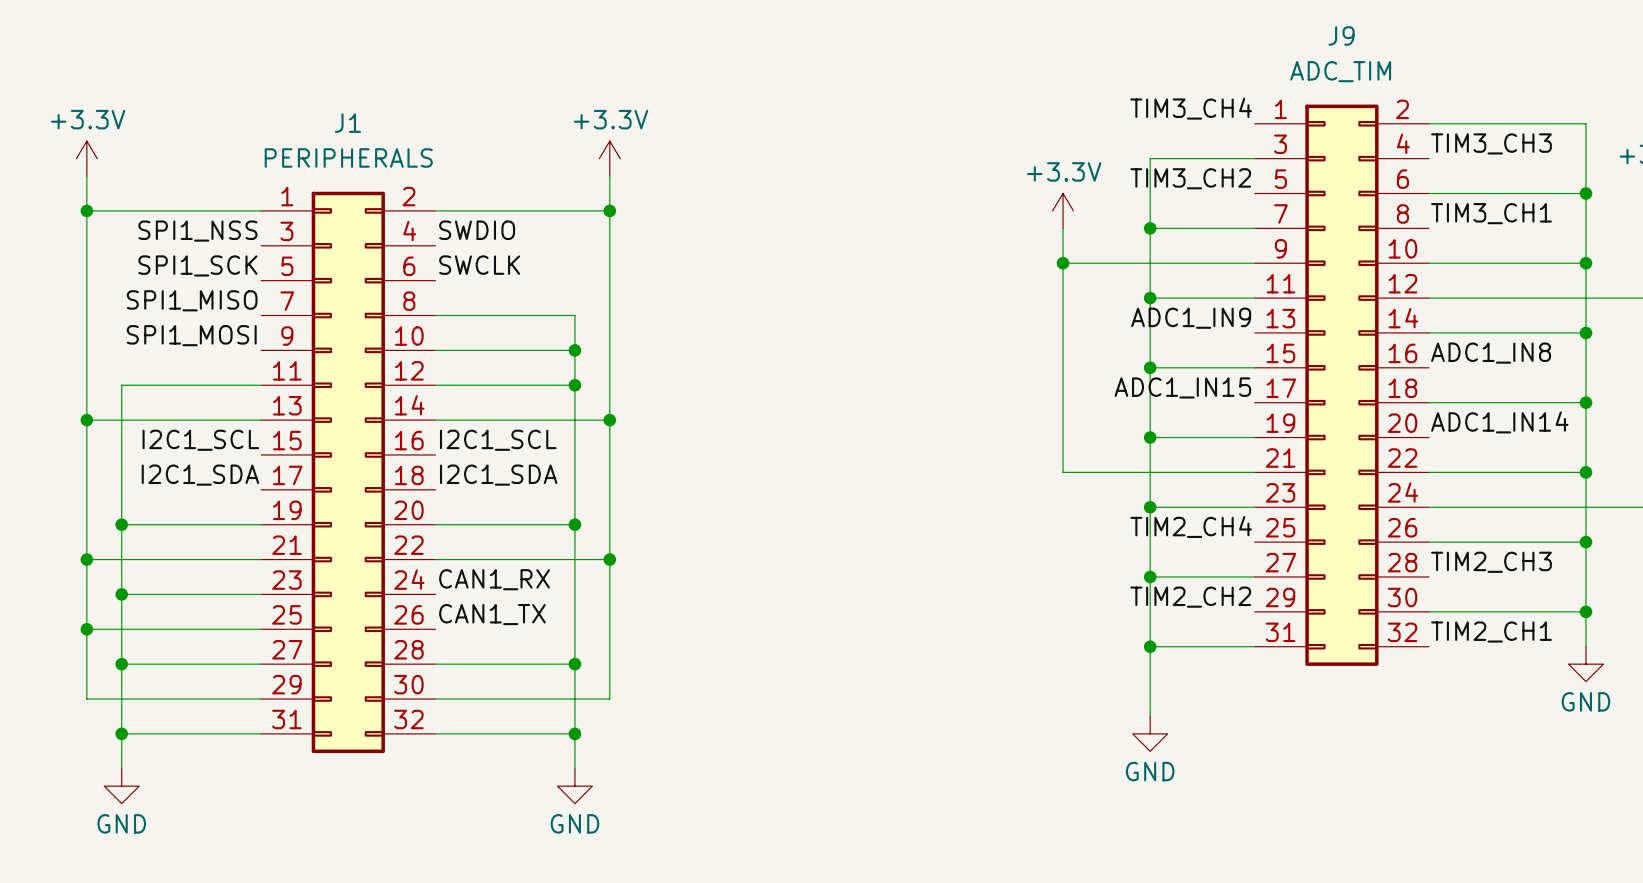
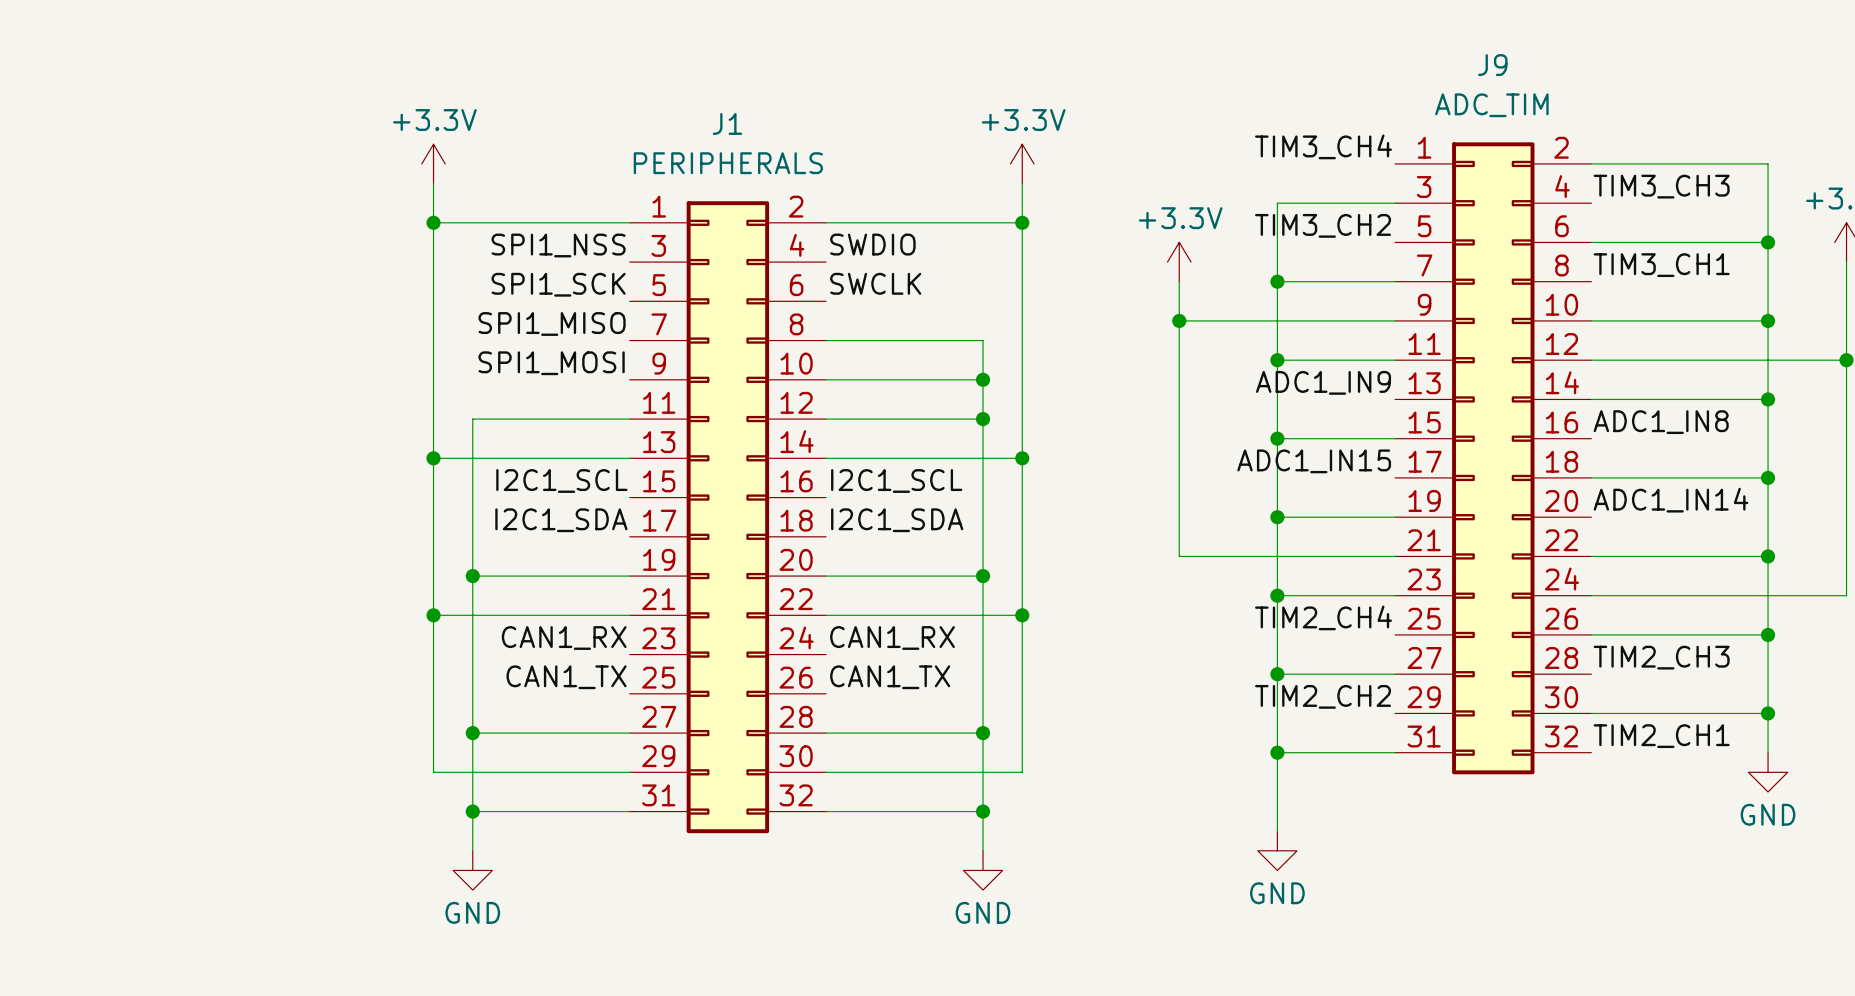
power symbol: none -> +3.3V (433, 163)
power symbol: none -> +3.3V (1022, 163)
wire: none -> (433, 183) (433, 772) (472, 772)
wire: none -> (1022, 183) (1022, 772) (826, 772)
power symbol: +3.3V (86, 158) -> none
power symbol: +3.3V (609, 158) -> none
wire: (86, 176) (86, 699) (261, 699) -> none
junction: none -> (433, 222)
wire: (609, 176) (609, 699) (574, 699) -> none
junction: none -> (1022, 222)
wire: (86, 210) (261, 210) -> (433, 222) (629, 222)
junction: (86, 210) -> none
wire: (435, 210) (609, 210) -> (826, 222) (1022, 222)
junction: (609, 210) -> none
label position: SWDIO (477, 230) -> SWDIO (872, 244)
label position: SPI1_NSS (197, 231) -> SPI1_NSS (558, 245)
label position: SPI1_SCK (197, 265) -> SPI1_SCK (558, 284)
label position: SWCLK (479, 265) -> SWCLK (875, 283)
label position: SPI1_MISO (192, 300) -> SPI1_MISO (552, 323)
wire: (435, 315) (574, 315) (574, 768) -> (826, 340) (983, 340) (983, 850)
wire: none -> (826, 379) (983, 379)
junction: none -> (983, 379)
label position: SPI1_MOSI (191, 335) -> SPI1_MOSI (551, 363)
junction: (574, 350) -> none
wire: none -> (826, 419) (983, 419)
junction: none -> (983, 419)
wire: (261, 385) (121, 385) (121, 768) -> none
junction: none -> (433, 458)
junction: (574, 385) -> none
junction: none -> (1022, 458)
label: none -> I2C1_SCL (896, 480)
wire: (86, 420) (261, 420) -> none
junction: (86, 420) -> none
wire: (435, 420) (609, 420) -> (826, 458) (1022, 458)
junction: (609, 420) -> none
label: I2C1_SCL (200, 440) -> none
label position: I2C1_SCL (498, 440) -> I2C1_SCL (561, 480)
label: none -> I2C1_SDA (897, 520)
J1 position: (348, 472) -> (727, 517)
label: I2C1_SDA (200, 475) -> none
label position: I2C1_SDA (498, 475) -> I2C1_SDA (561, 520)
junction: none -> (472, 576)
wire: none -> (826, 576) (983, 576)
junction: none -> (983, 576)
wire: (121, 524) (261, 524) -> (472, 576) (629, 576)
junction: (121, 524) -> none
junction: none -> (433, 615)
junction: (574, 524) -> none
junction: none -> (1022, 615)
label: none -> CAN1_RX (892, 637)
wire: (86, 559) (261, 559) -> none
junction: (86, 559) -> none
wire: (435, 559) (609, 559) -> (826, 615) (1022, 615)
junction: (609, 559) -> none
label position: CAN1_RX (494, 579) -> CAN1_RX (564, 637)
label: none -> CAN1_TX (890, 677)
wire: (121, 594) (261, 594) -> none
junction: (121, 594) -> none
label position: CAN1_TX (492, 614) -> CAN1_TX (566, 677)
wire: (86, 629) (261, 629) -> none
junction: (86, 629) -> none
junction: none -> (472, 733)
wire: none -> (826, 733) (983, 733)
junction: none -> (983, 733)
wire: (121, 664) (261, 664) -> (472, 733) (629, 733)
junction: (121, 664) -> none
junction: (574, 664) -> none
junction: none -> (472, 811)
wire: none -> (826, 811) (983, 811)
junction: none -> (983, 811)
wire: (121, 733) (261, 733) -> none
junction: (121, 733) -> none
wire: (435, 733) (574, 733) -> (472, 850) (472, 419)
junction: (574, 733) -> none
power symbol: none -> GND (983, 870)
power symbol: GND (121, 786) -> none
power symbol position: GND (574, 786) -> GND (472, 870)

